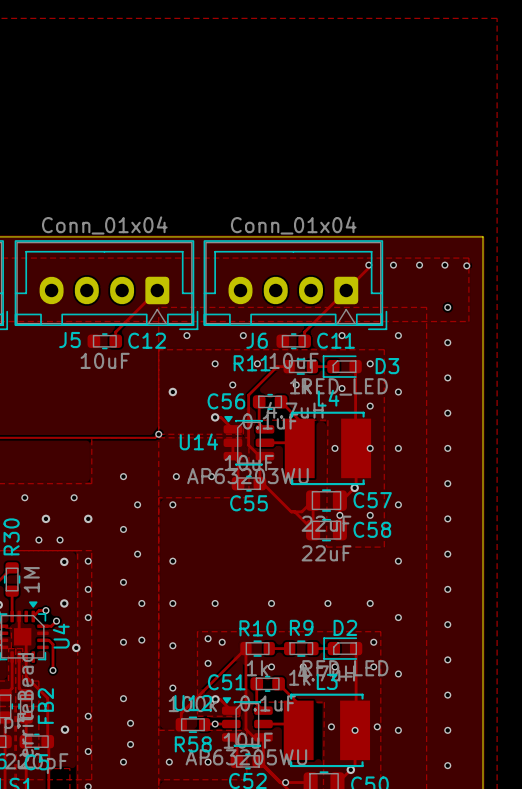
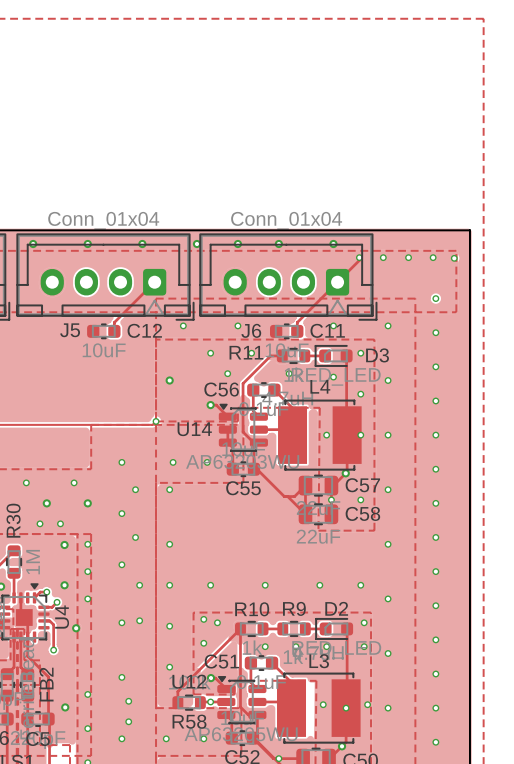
via: none -> (33, 244)
via: none -> (87, 244)
via: none -> (142, 244)
via: none -> (196, 244)
via: none -> (237, 244)
via: none -> (278, 244)
via: none -> (333, 244)

